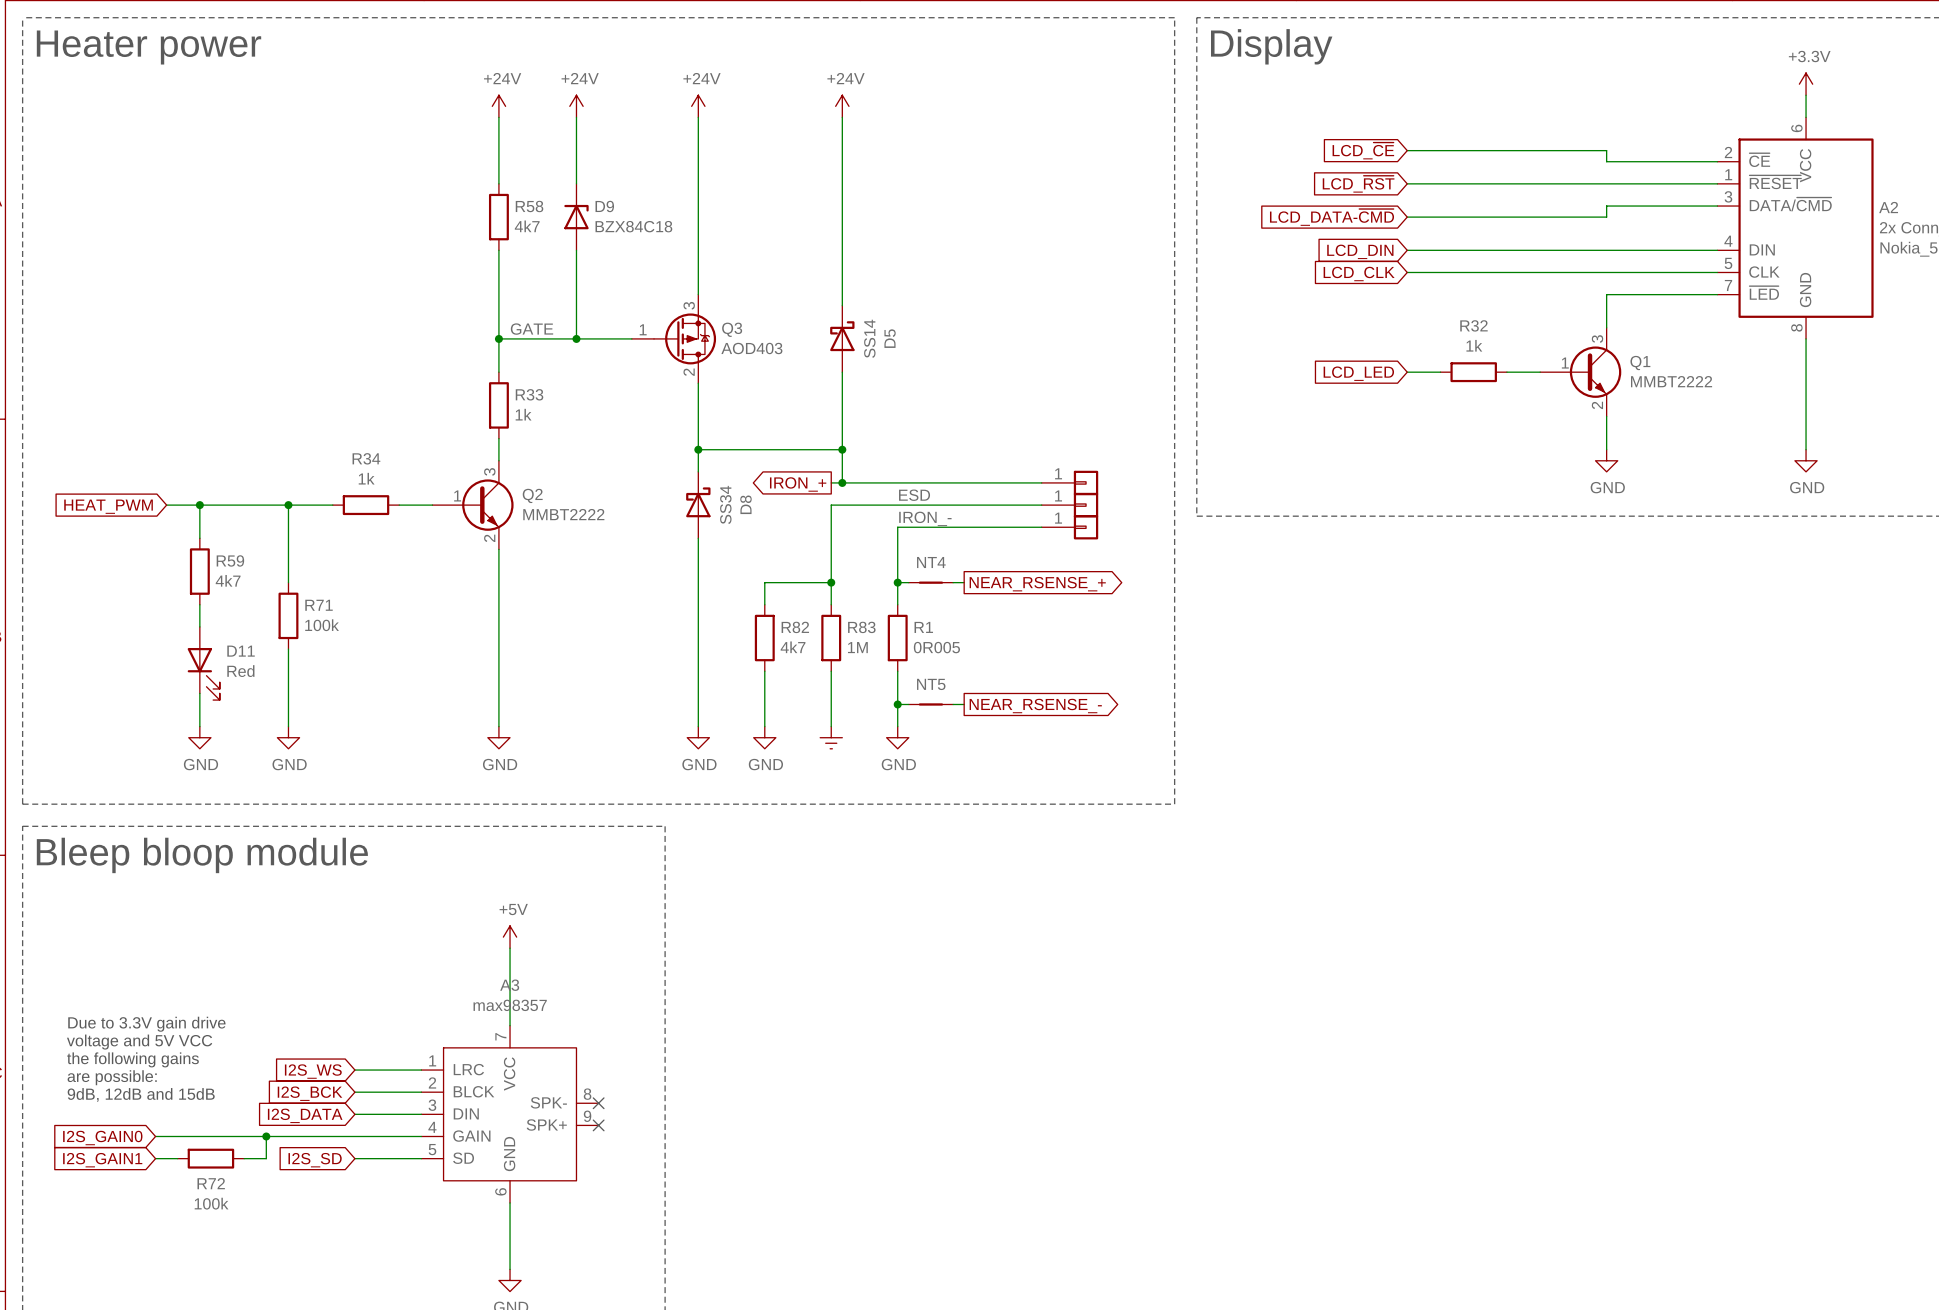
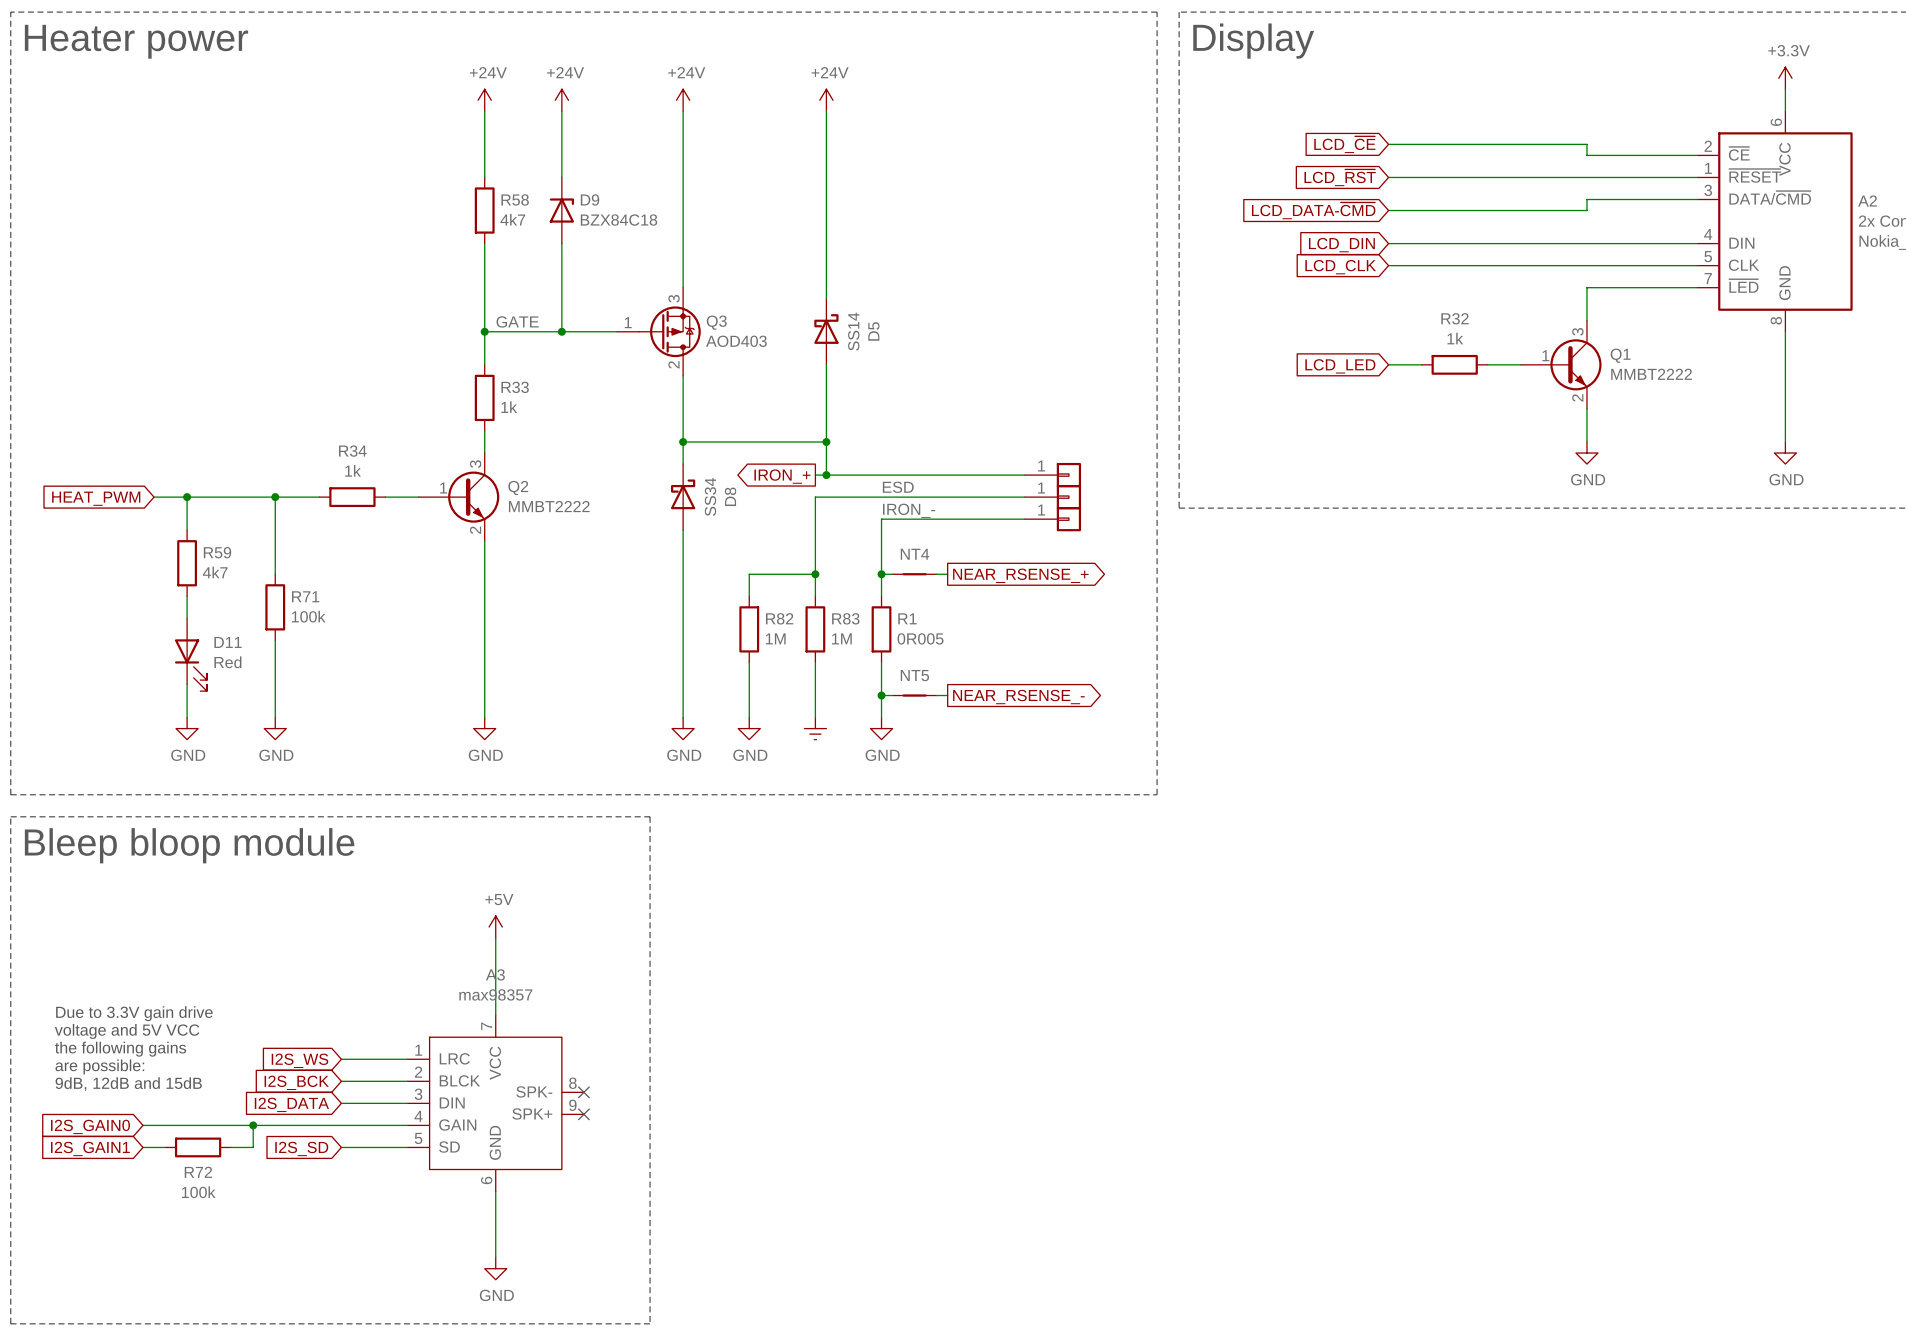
R82 value: 4k7 (793, 647) -> 1M (775, 638)

